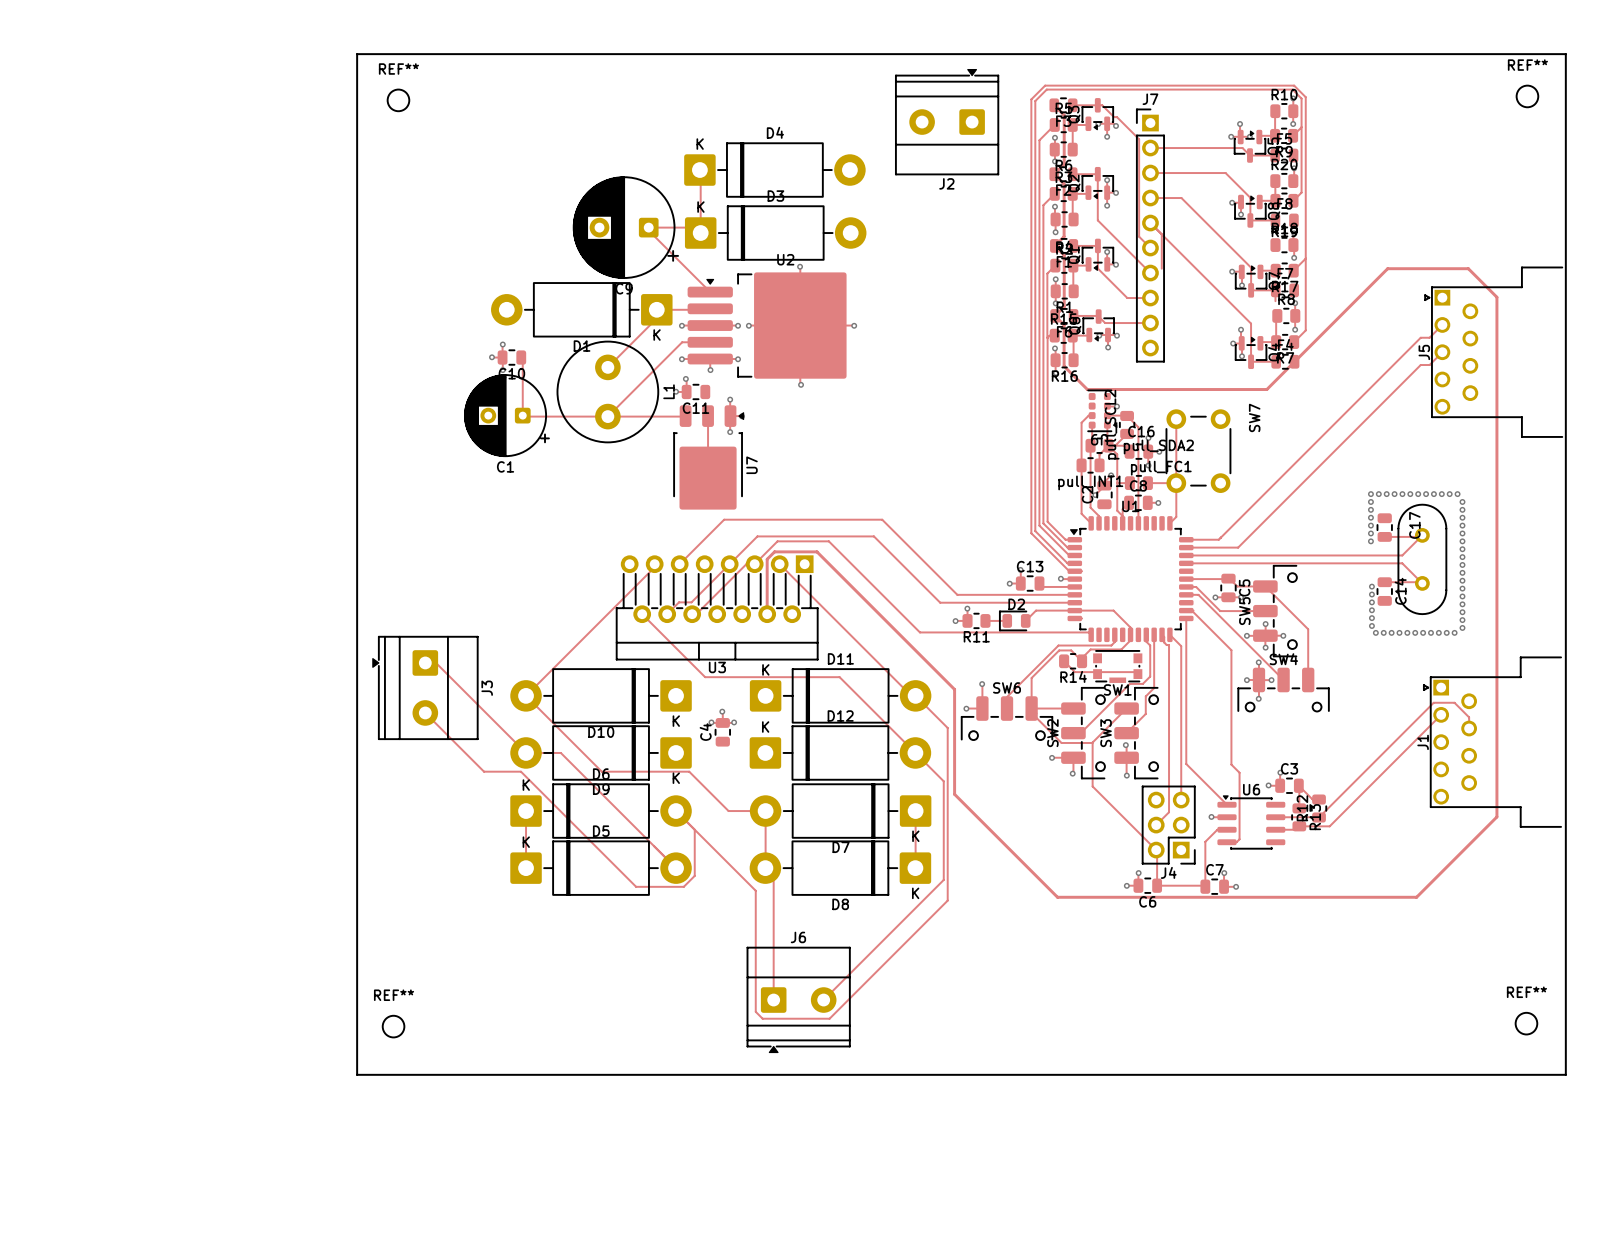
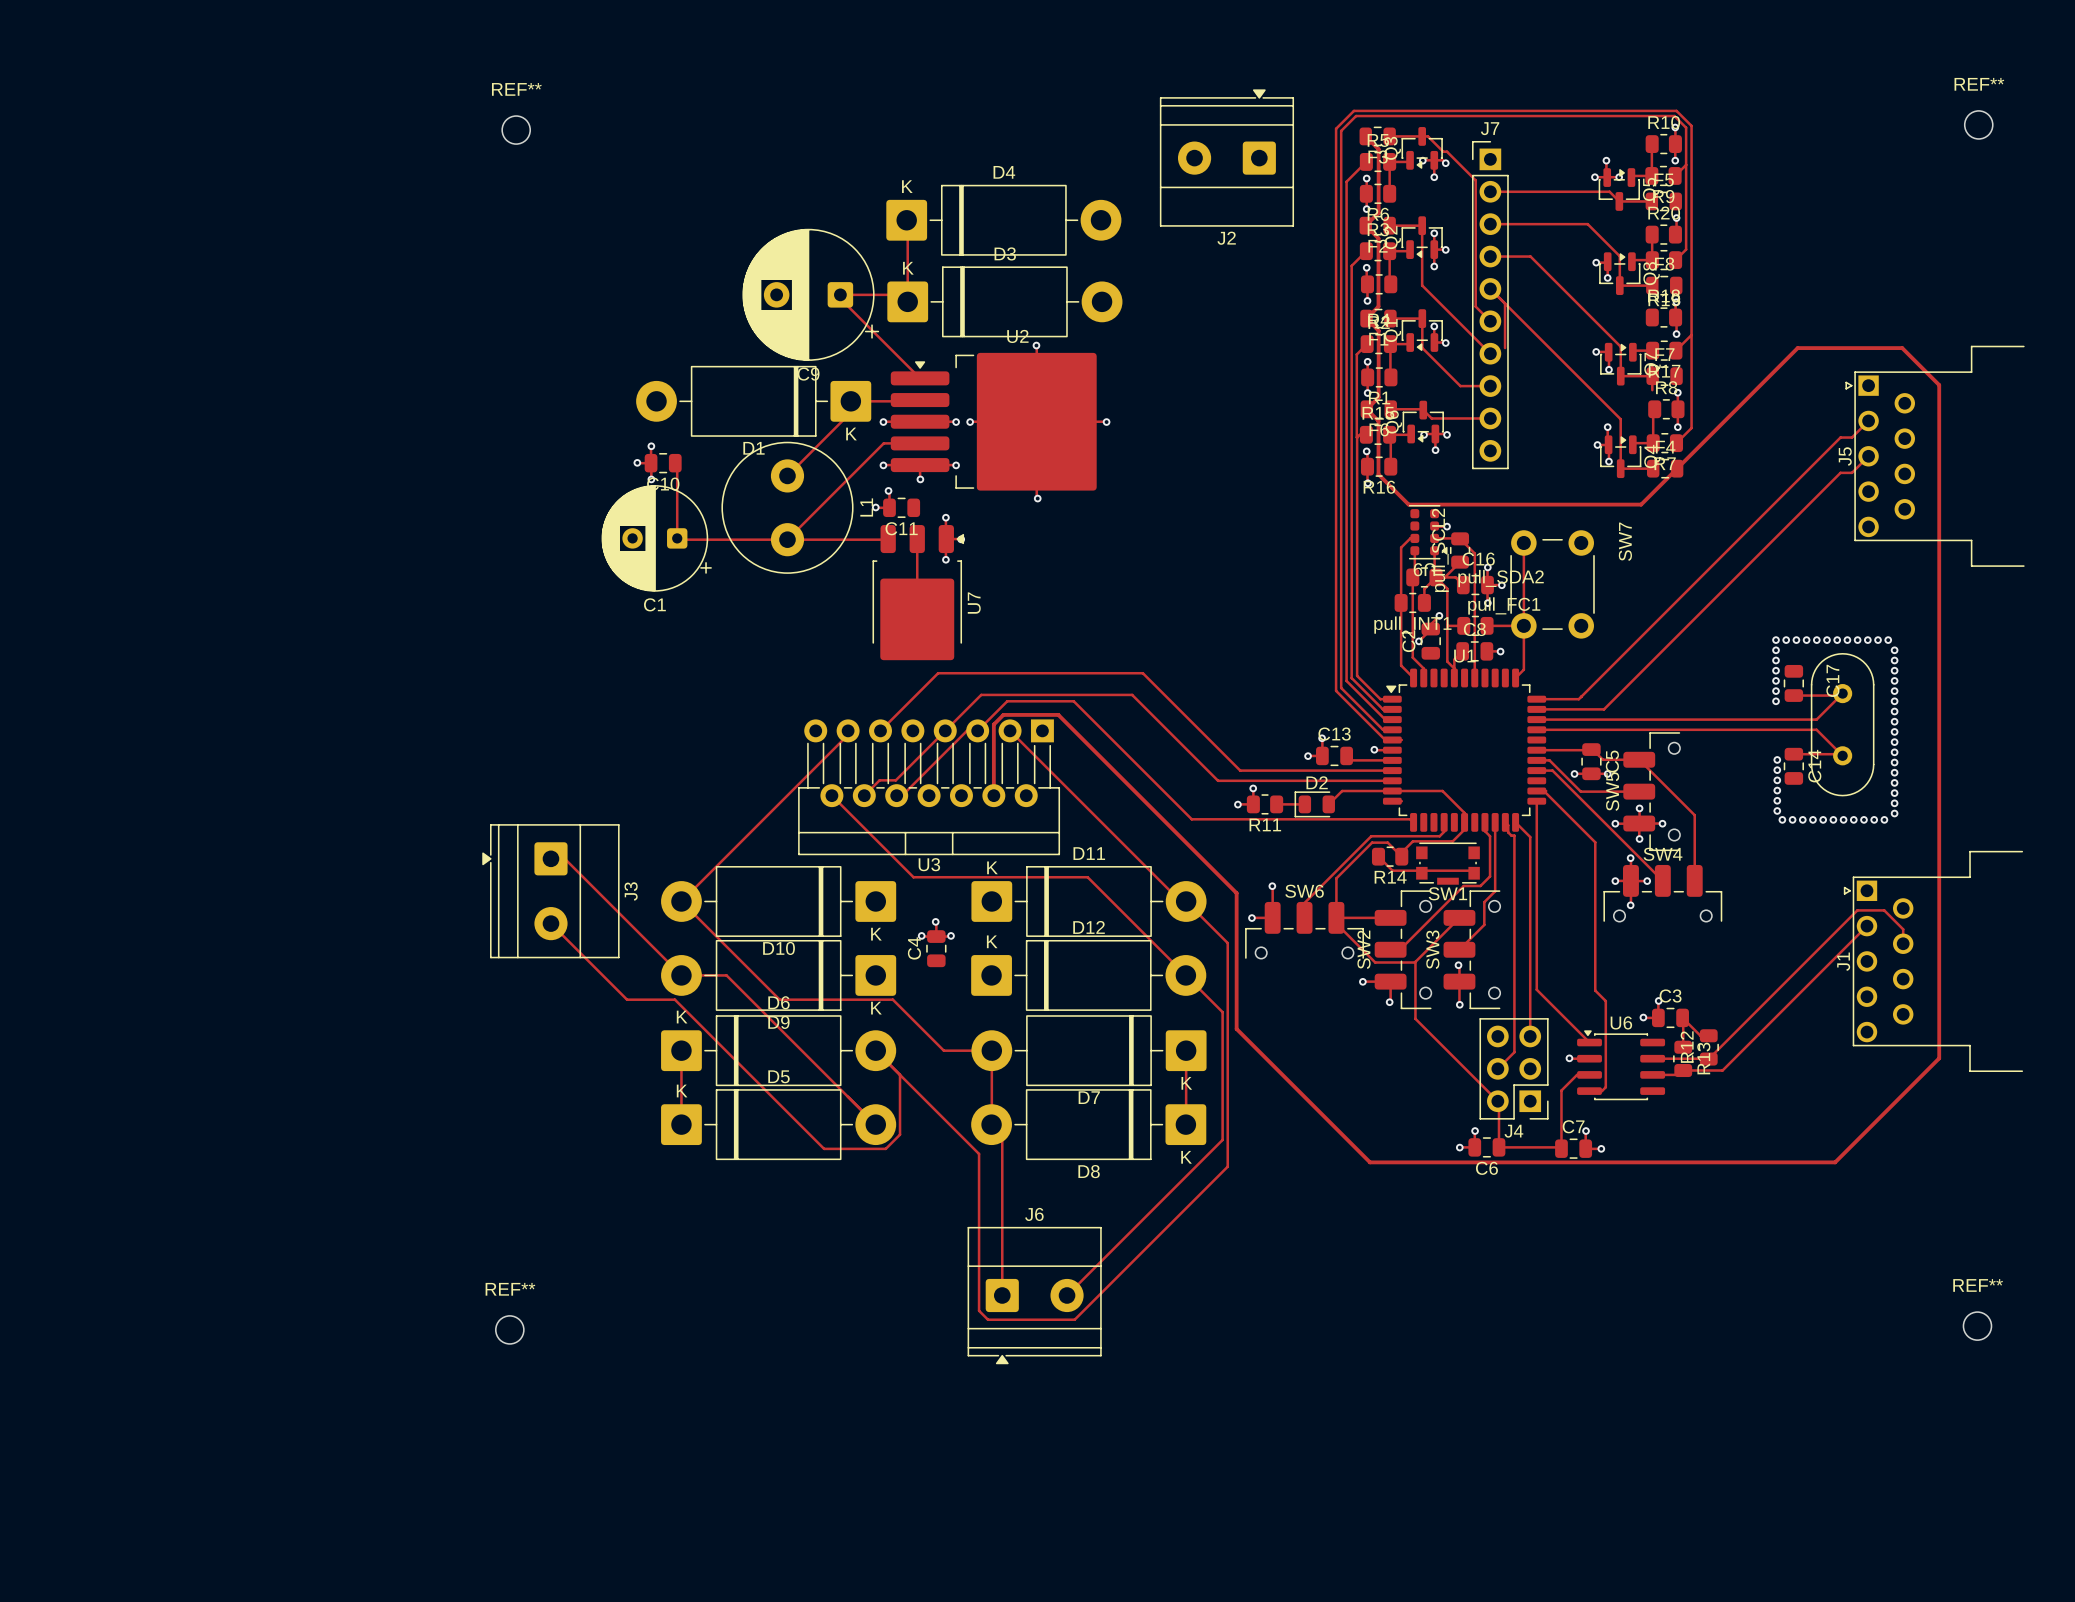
board edge: (357, 54) (1565, 54) (1565, 1074) (357, 1074) (357, 54) -> none

